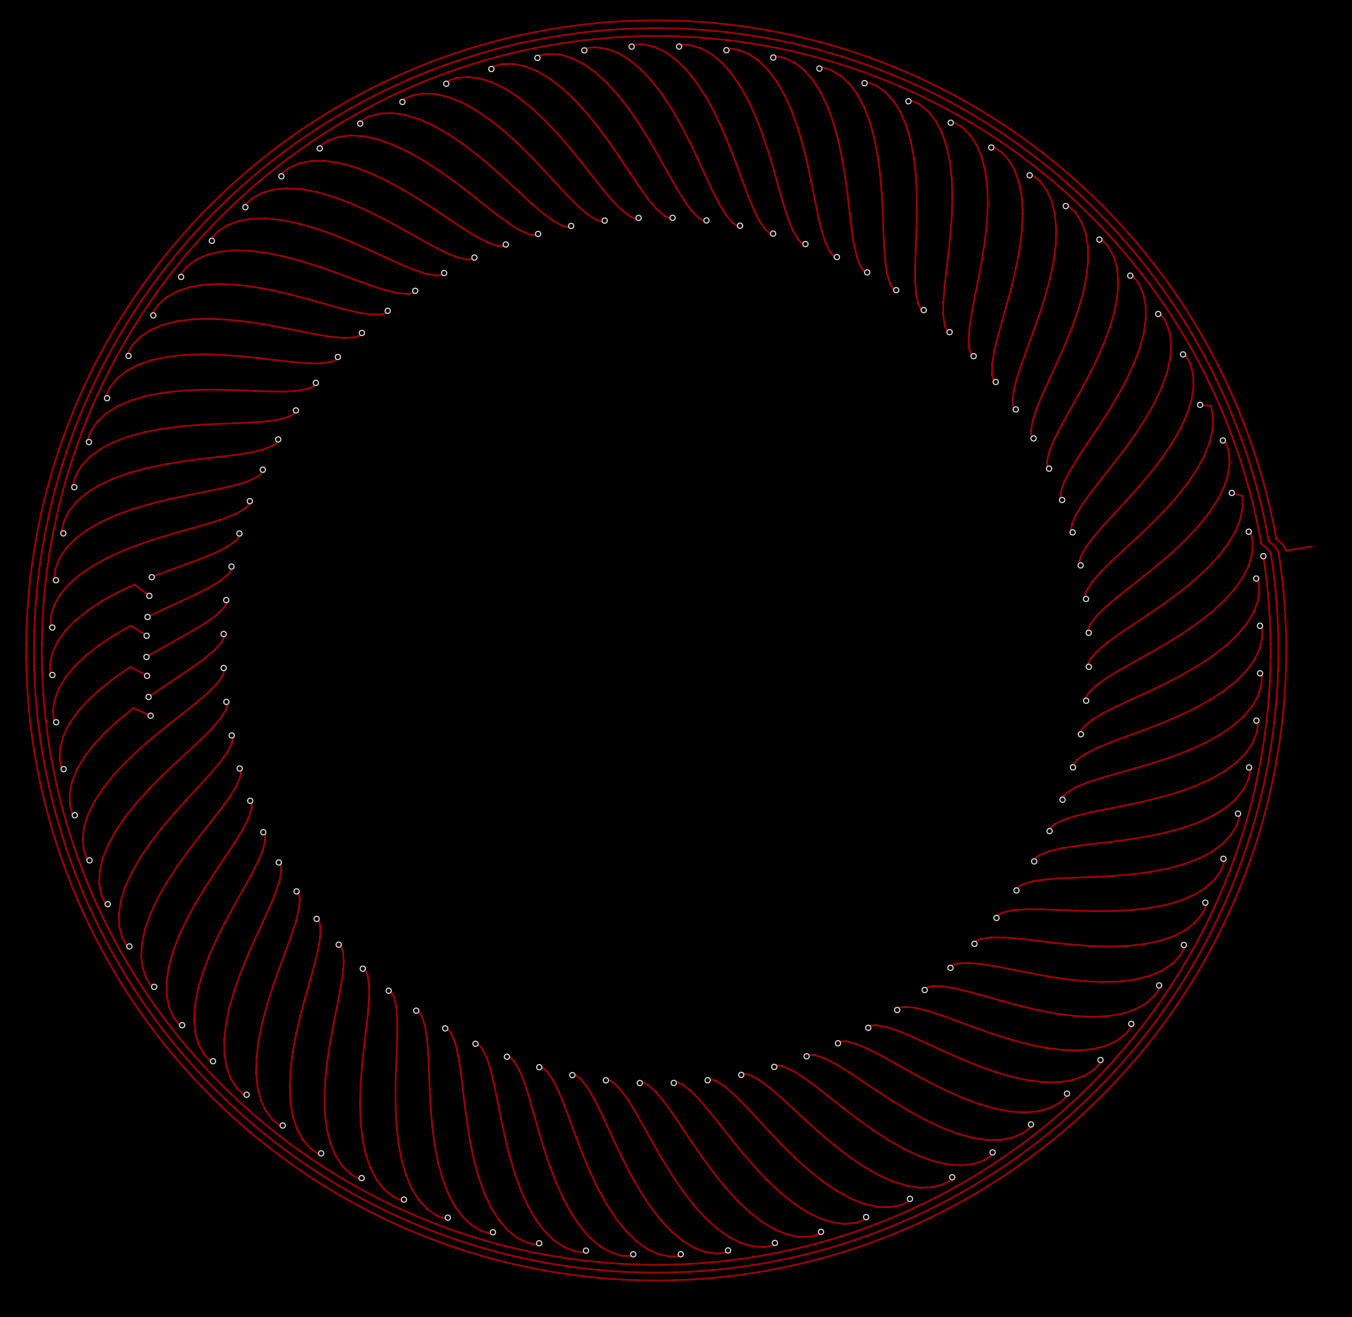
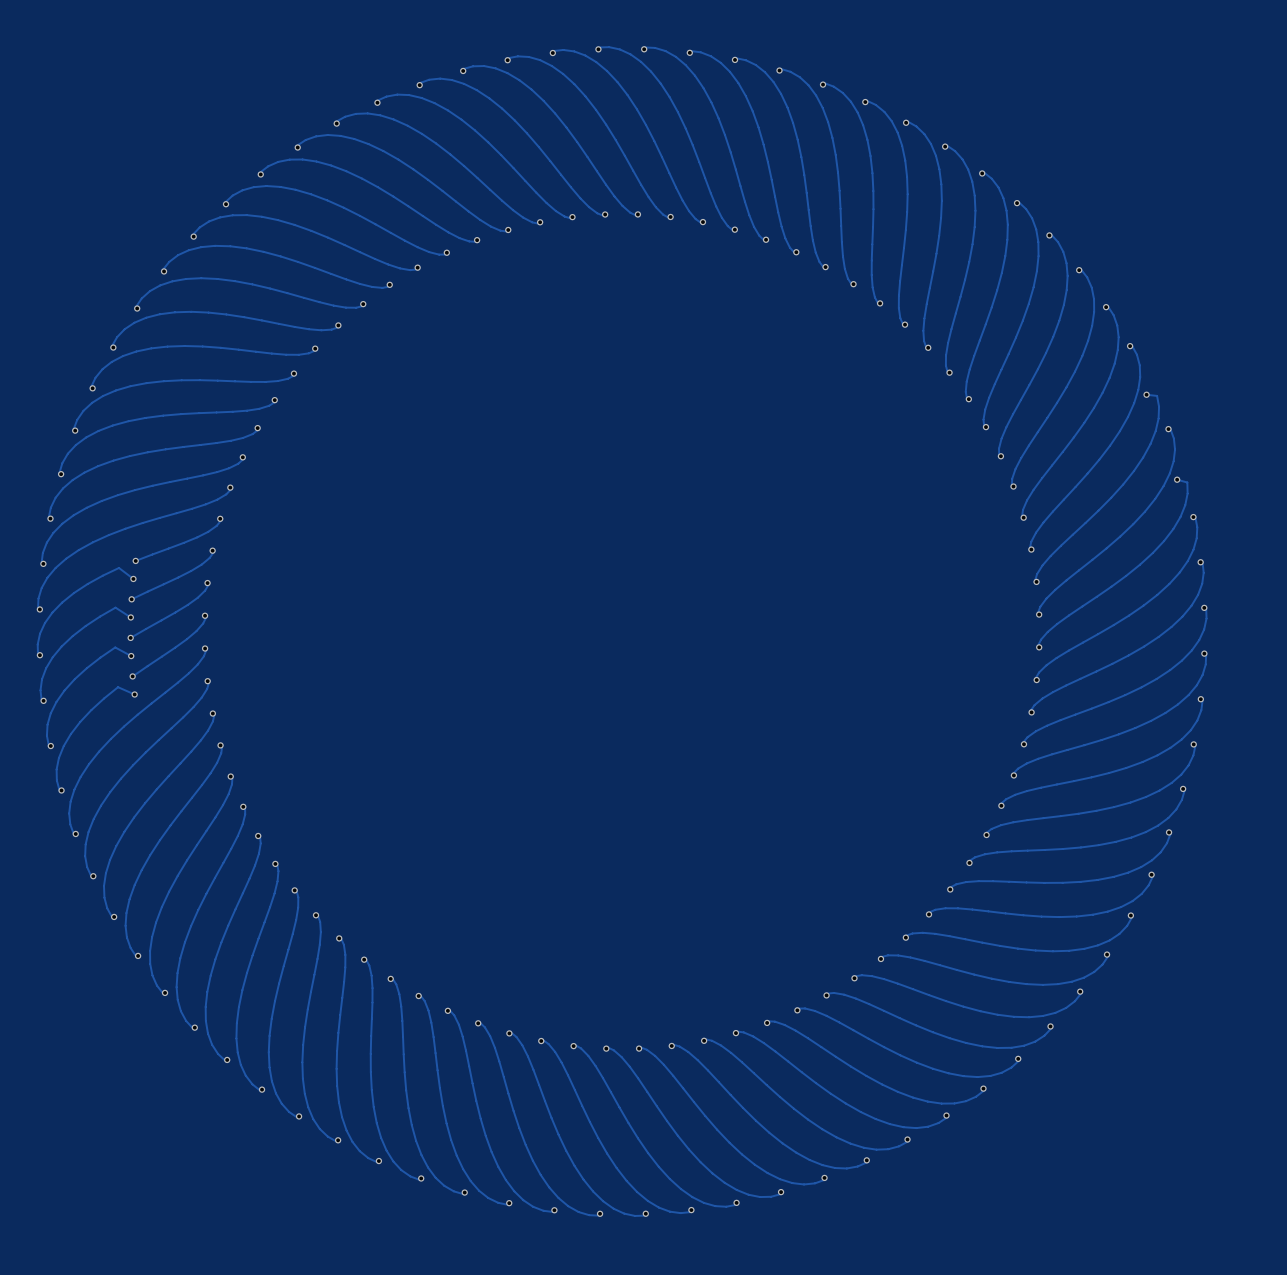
track: (1276, 538) (1264, 487) (1244, 424) (1217, 364) (1184, 307) (1145, 253) (1110, 214) (1062, 169) (1010, 129) (965, 101) (906, 72) (844, 49) (780, 32) (728, 24) (662, 20) (596, 23) (544, 30) (493, 41) (430, 62) (370, 89) (324, 114) (280, 144) (229, 186) (183, 233) (142, 285) (107, 341) (83, 388) (59, 449) (41, 512) (31, 564) (26, 630) (27, 696) (33, 748) (47, 813) (63, 863) (88, 924) (120, 982) (150, 1026) (192, 1076) (239, 1123) (291, 1163) (346, 1199) (393, 1223) (455, 1247) (518, 1265) (570, 1274) (636, 1280) (702, 1278) (754, 1272) (831, 1255) (906, 1228) (976, 1192) (1031, 1156) (1092, 1105) (1145, 1046) (1191, 982) (1229, 912) (1257, 838) (1276, 761) (1285, 683) (1284, 604) (1278, 551) (1268, 541) (1257, 489) (1241, 439) (1216, 379) (1185, 322) (1139, 258) (1096, 210) (1037, 158) (972, 114) (903, 79) (829, 52) (753, 35) (675, 28) (597, 30) (533, 40) (457, 60) (385, 90) (317, 128) (254, 175) (198, 229) (148, 289) (107, 356) (75, 427) (55, 489) (39, 565) (33, 643) (36, 708) (48, 786) (70, 861) (95, 921) (134, 989) (180, 1052) (235, 1108) (295, 1157) (362, 1198) (433, 1231) (507, 1254) (584, 1268) (662, 1272) (740, 1266) (817, 1251) (879, 1231) (950, 1198) (1016, 1157) (1077, 1108) (1131, 1052) (1178, 989) (1216, 921) (1245, 848) (1266, 773) (1275, 708) (1278, 630) (1270, 553) (1261, 543) (1242, 466) (1225, 418) (1209, 383) (1171, 315) (1125, 253) (1072, 198) (1032, 164) (1001, 142) (935, 102) (888, 81) (852, 68) (777, 48) (701, 37) (662, 36) (611, 37) (534, 48) (460, 68) (424, 81) (377, 102) (332, 128) (300, 149) (240, 198) (186, 253) (140, 315) (103, 383) (73, 454) (53, 528) (43, 605) (41, 643) (43, 695) (53, 771) (73, 846) (87, 882) (108, 929) (148, 995) (195, 1056) (221, 1084) (259, 1119) (321, 1165) (388, 1203) (460, 1232) (534, 1252) (611, 1263) (688, 1263) (764, 1255) (839, 1236) (911, 1209) (979, 1172) (1022, 1143) (1052, 1119) (1108, 1066) (1157, 1006) (1197, 940) (1229, 870) (1252, 796) (1266, 721) (1270, 643) (1268, 605) (1263, 554) -> none
track: (1276, 538) (1286, 550) (1312, 546) -> none
via: (1263, 556) -> none

